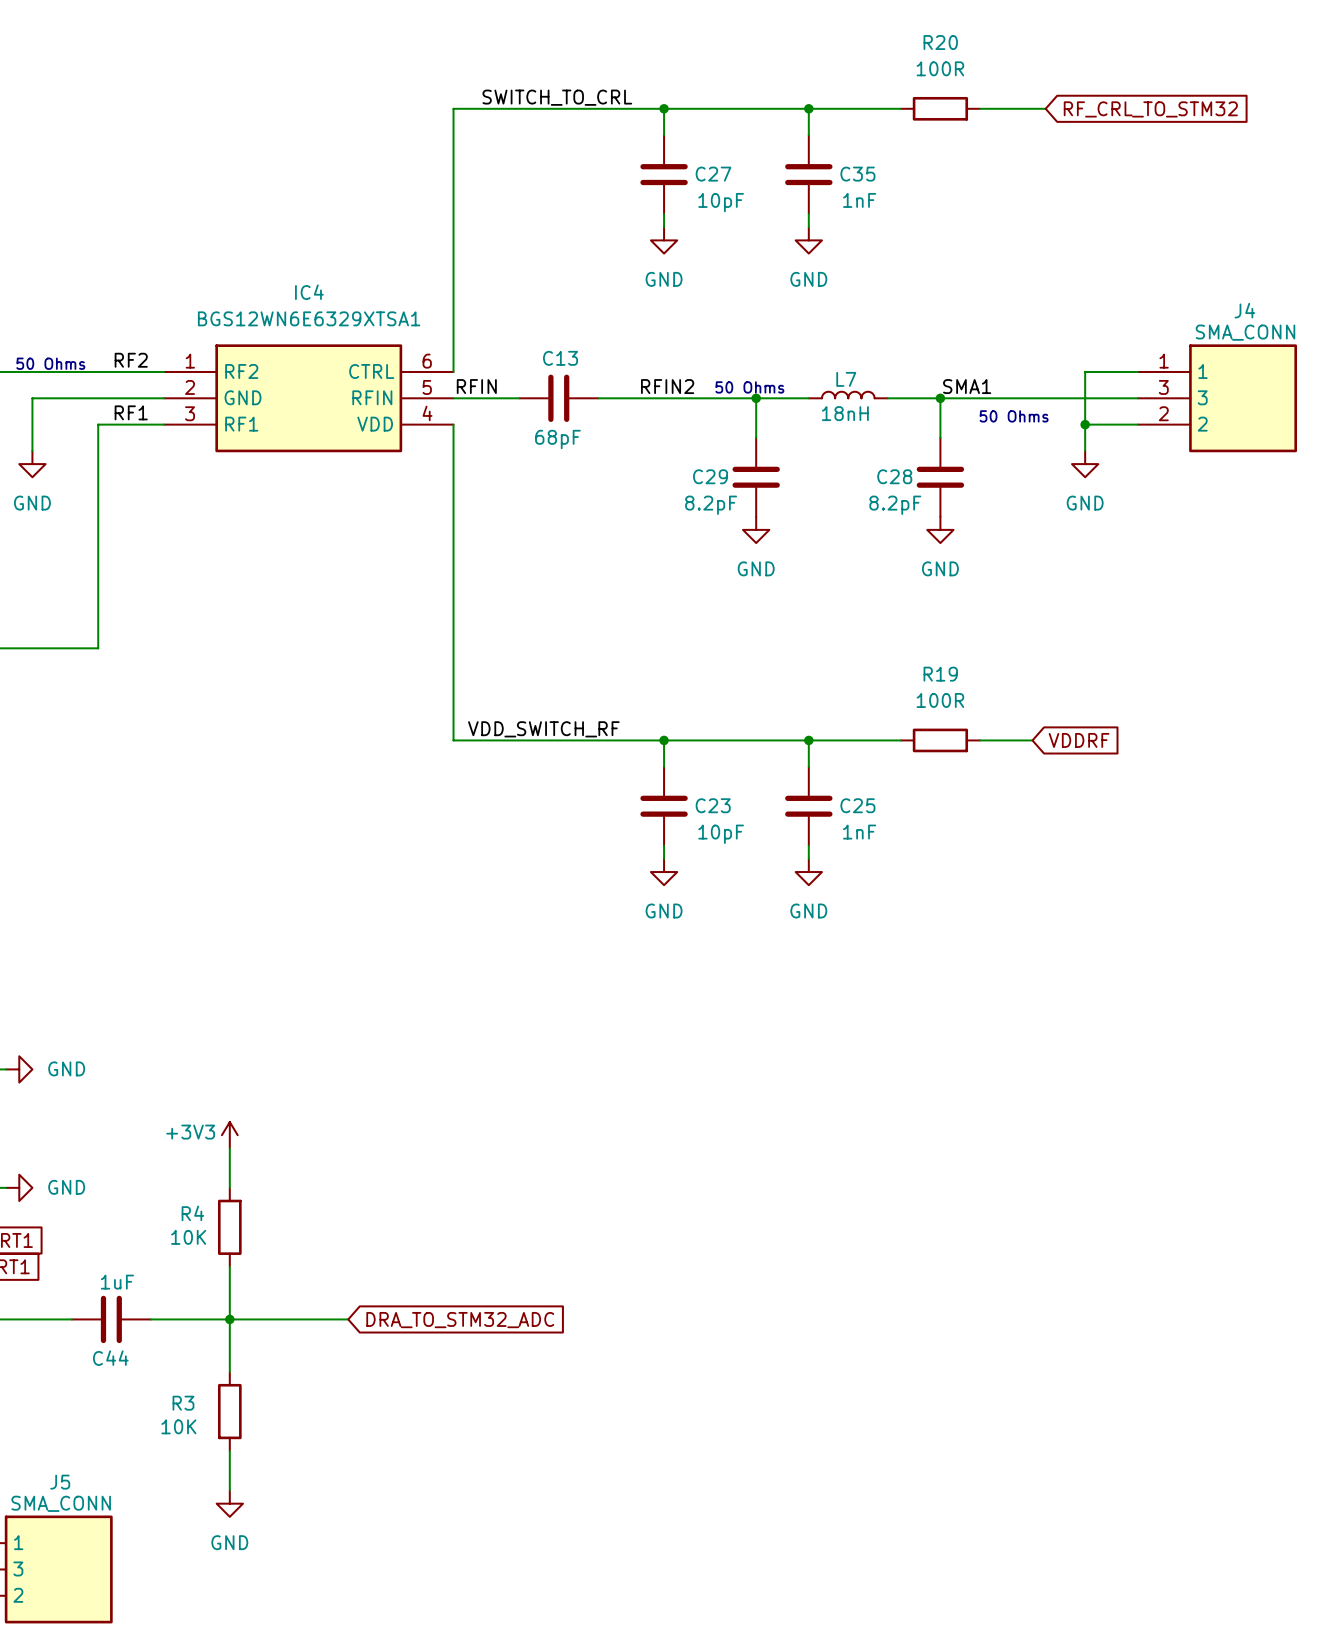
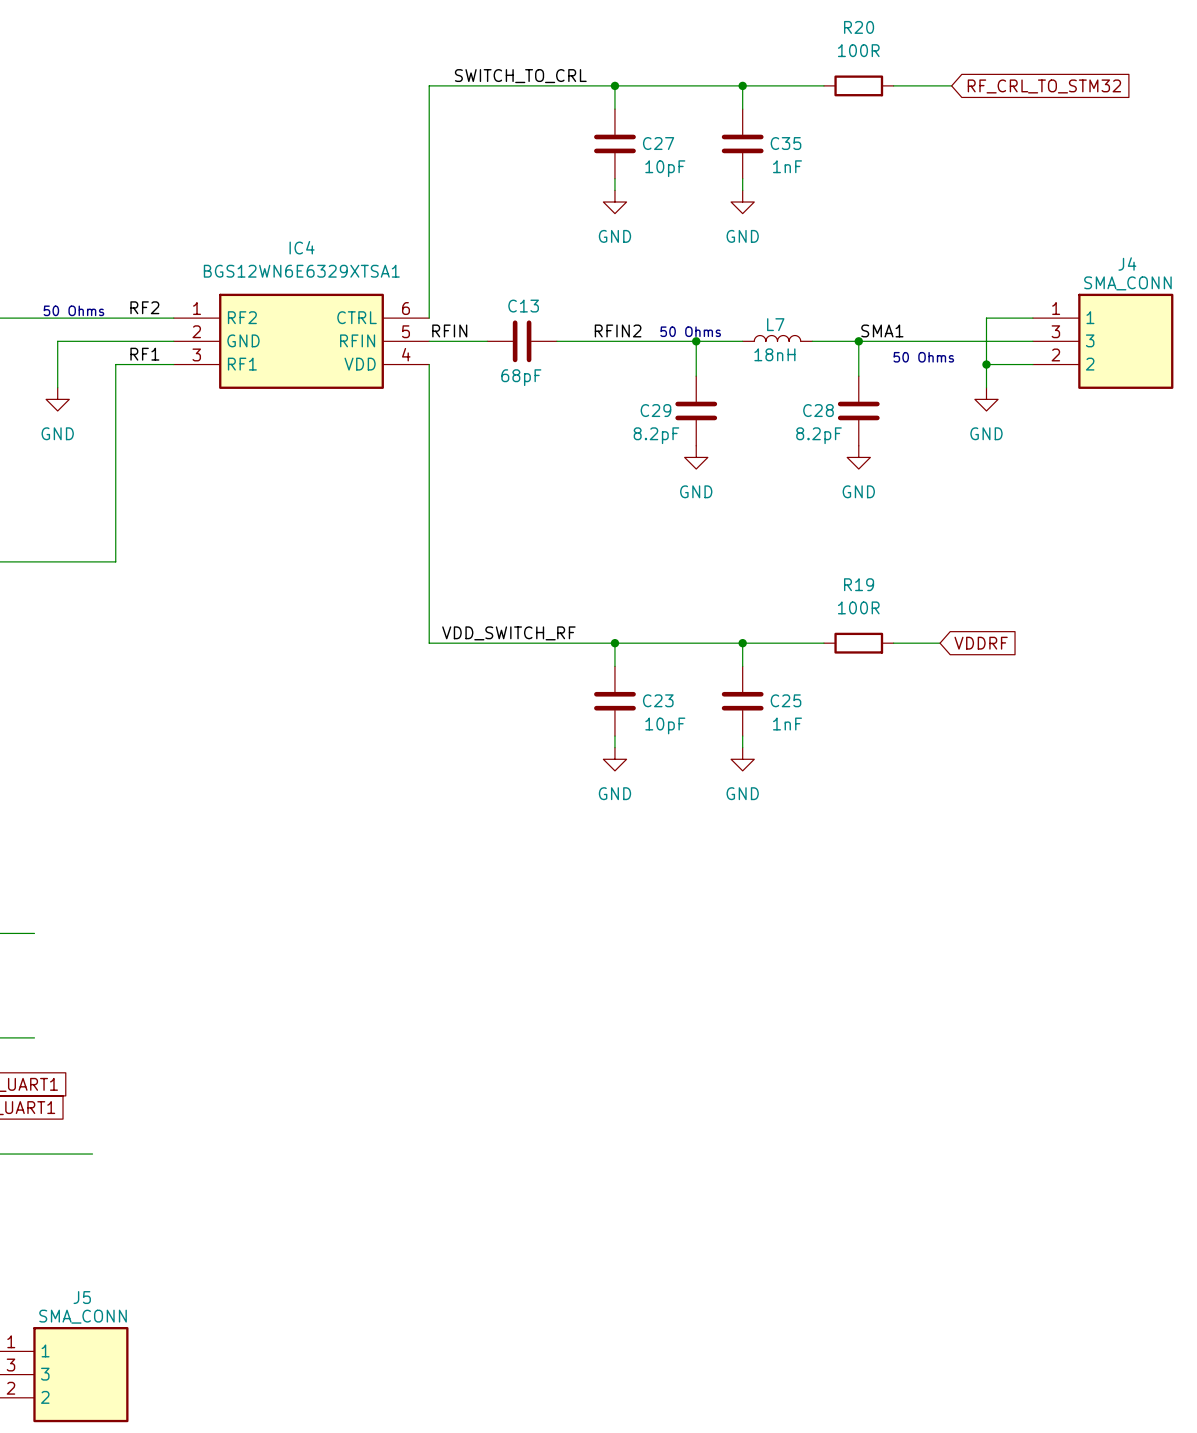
power symbol: GND (19, 1069) -> none
power symbol: +3V3 (229, 1135) -> none
wire: (229, 1148) (229, 1187) -> none
power symbol: GND (19, 1187) -> none
R4: 10K (229, 1227) -> none
wire: (229, 1266) (229, 1372) -> none
C44: 1uF (111, 1319) -> none
wire: (150, 1319) (348, 1319) -> none
junction: (229, 1319) -> none
global label: DRA_TO_STM32_ADC (460, 1320) -> none
R3: 10K (229, 1411) -> none
wire: (229, 1451) (229, 1490) -> none
power symbol: GND (229, 1503) -> none

